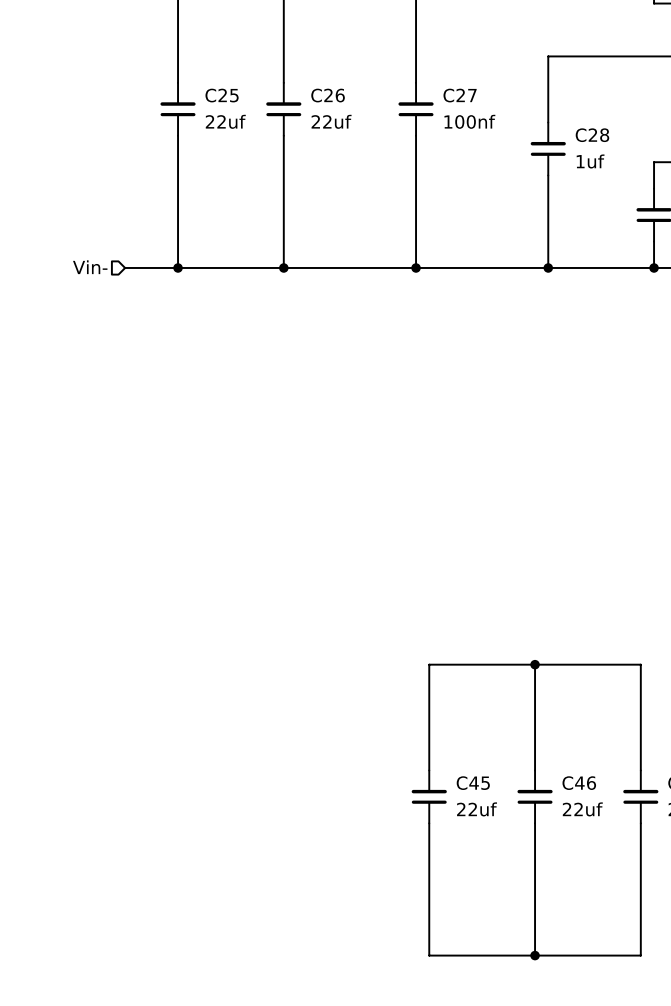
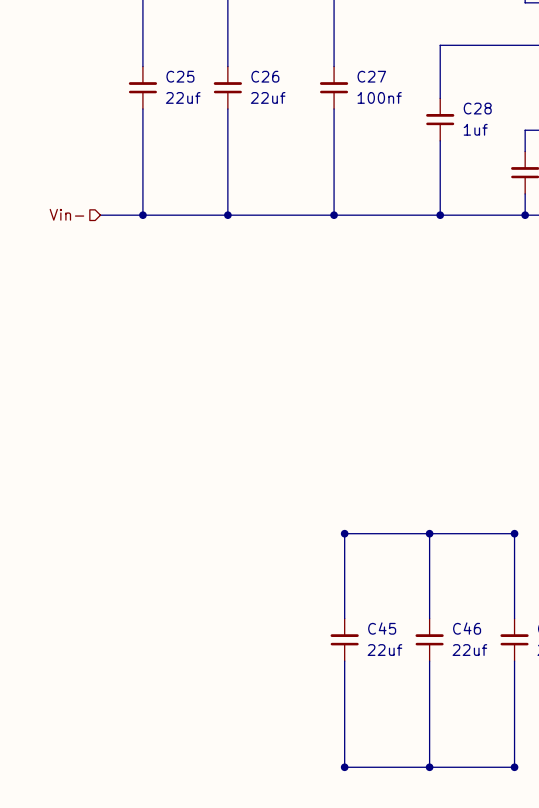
junction: none -> (344, 533)
junction: none -> (514, 533)
junction: none -> (344, 767)
junction: none -> (514, 767)

